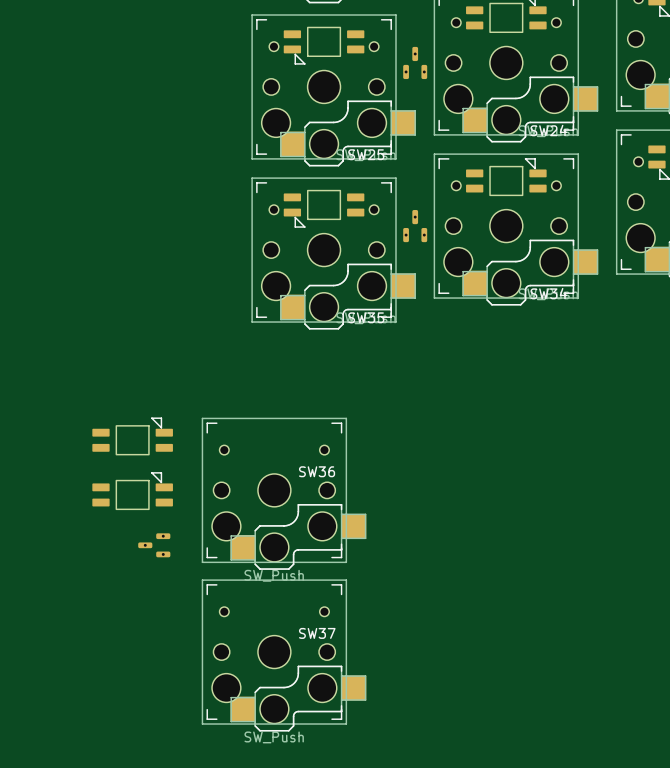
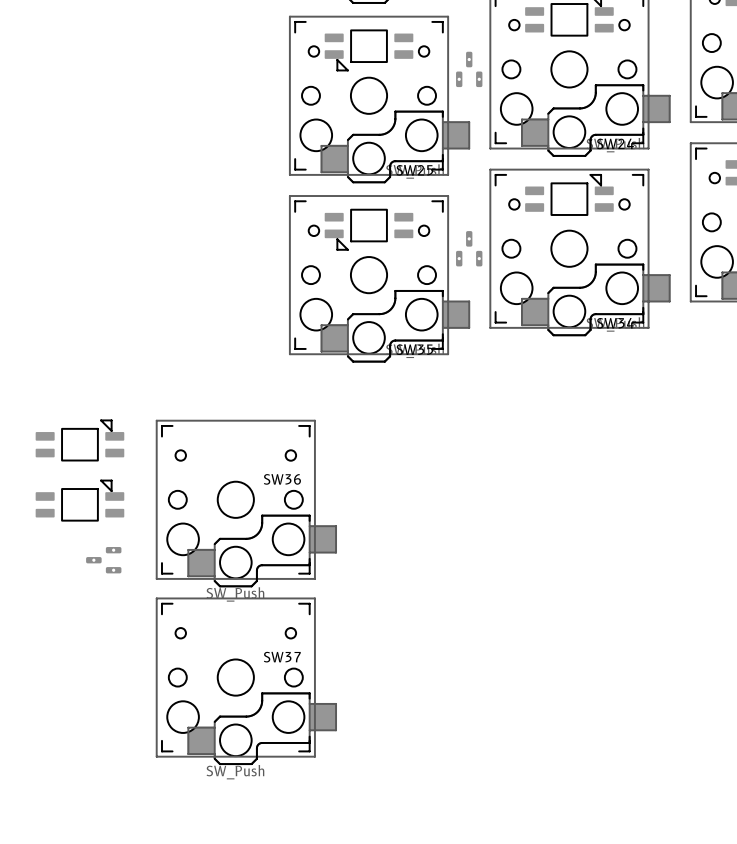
part: none -> (79, 440)
part: (132, 436) -> none
part: none -> (79, 500)
part: (132, 490) -> none
SW36 position: (283, 493) -> (246, 503)
part position: (154, 545) -> (103, 560)
SW37 position: (283, 655) -> (246, 681)

